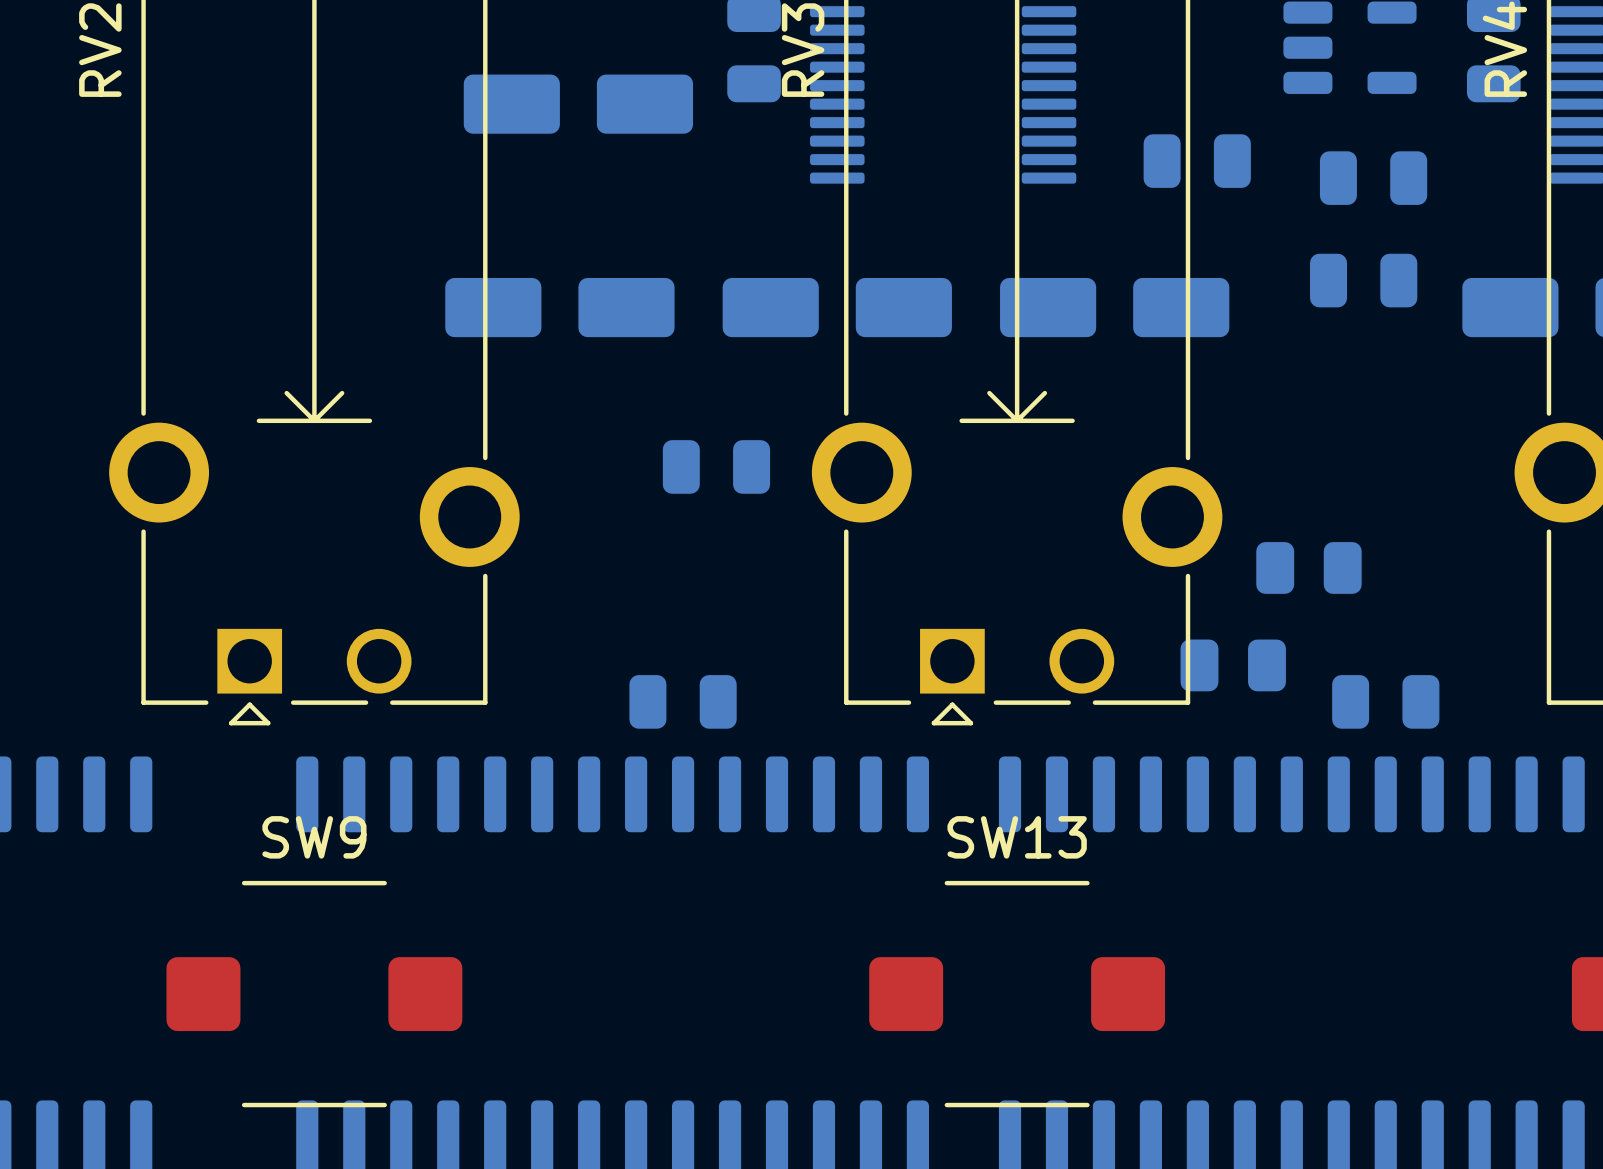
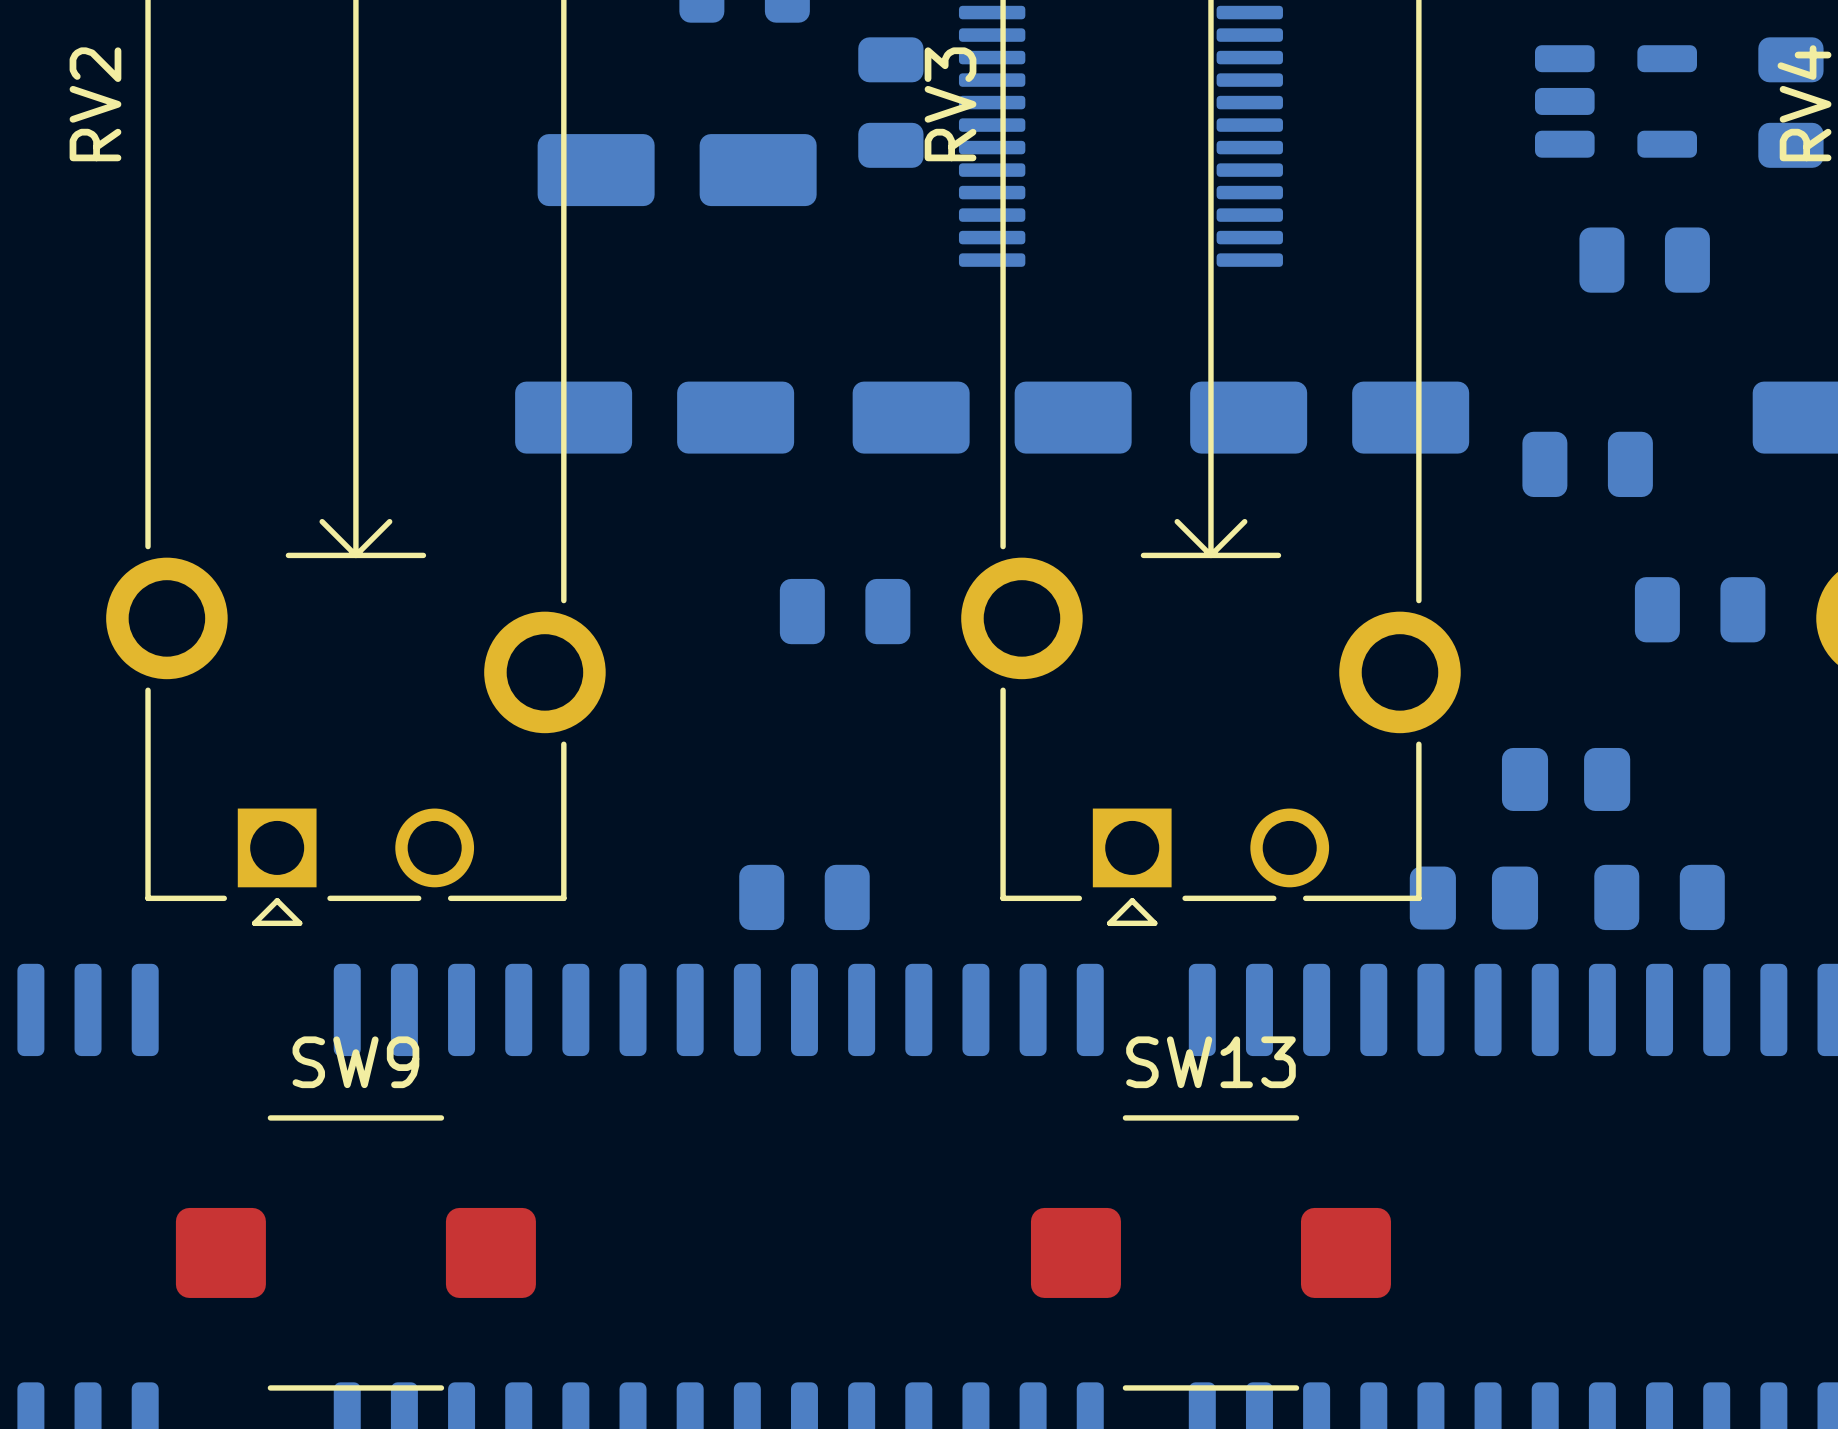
part: (1197, 161) -> none
part position: (1363, 280) -> (1587, 464)
part: none -> (1700, 609)
part position: (1308, 567) -> (1566, 779)
part position: (1233, 665) -> (1473, 898)

